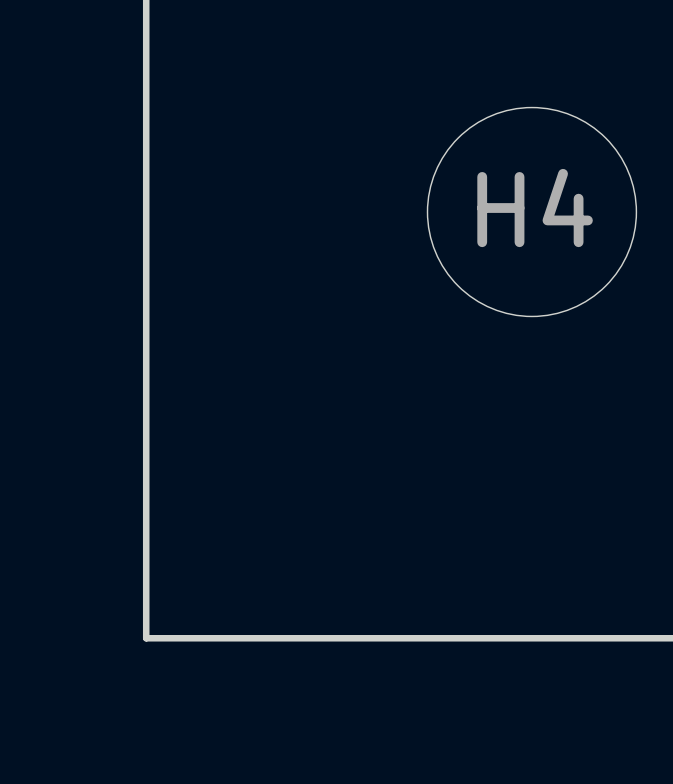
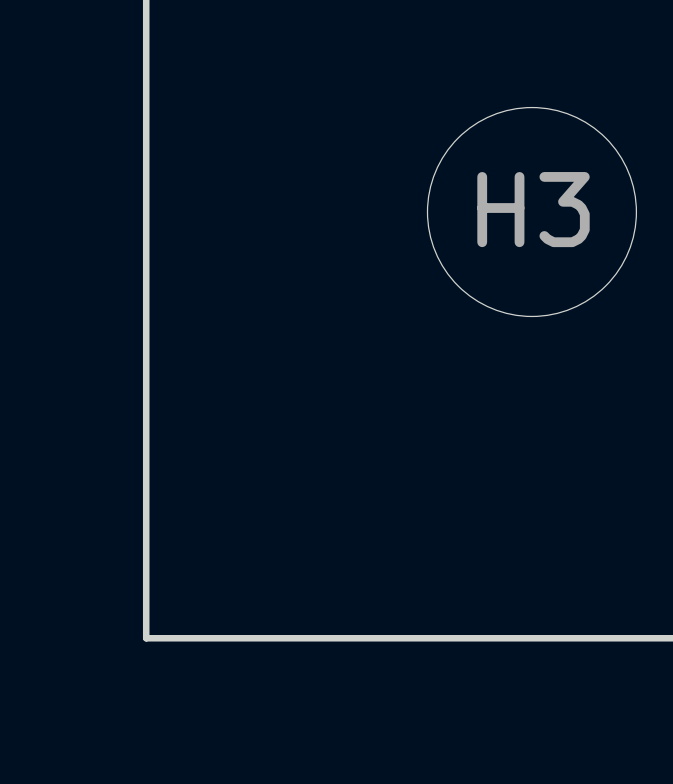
H4 name: H4 (535, 208) -> H3 (533, 209)

